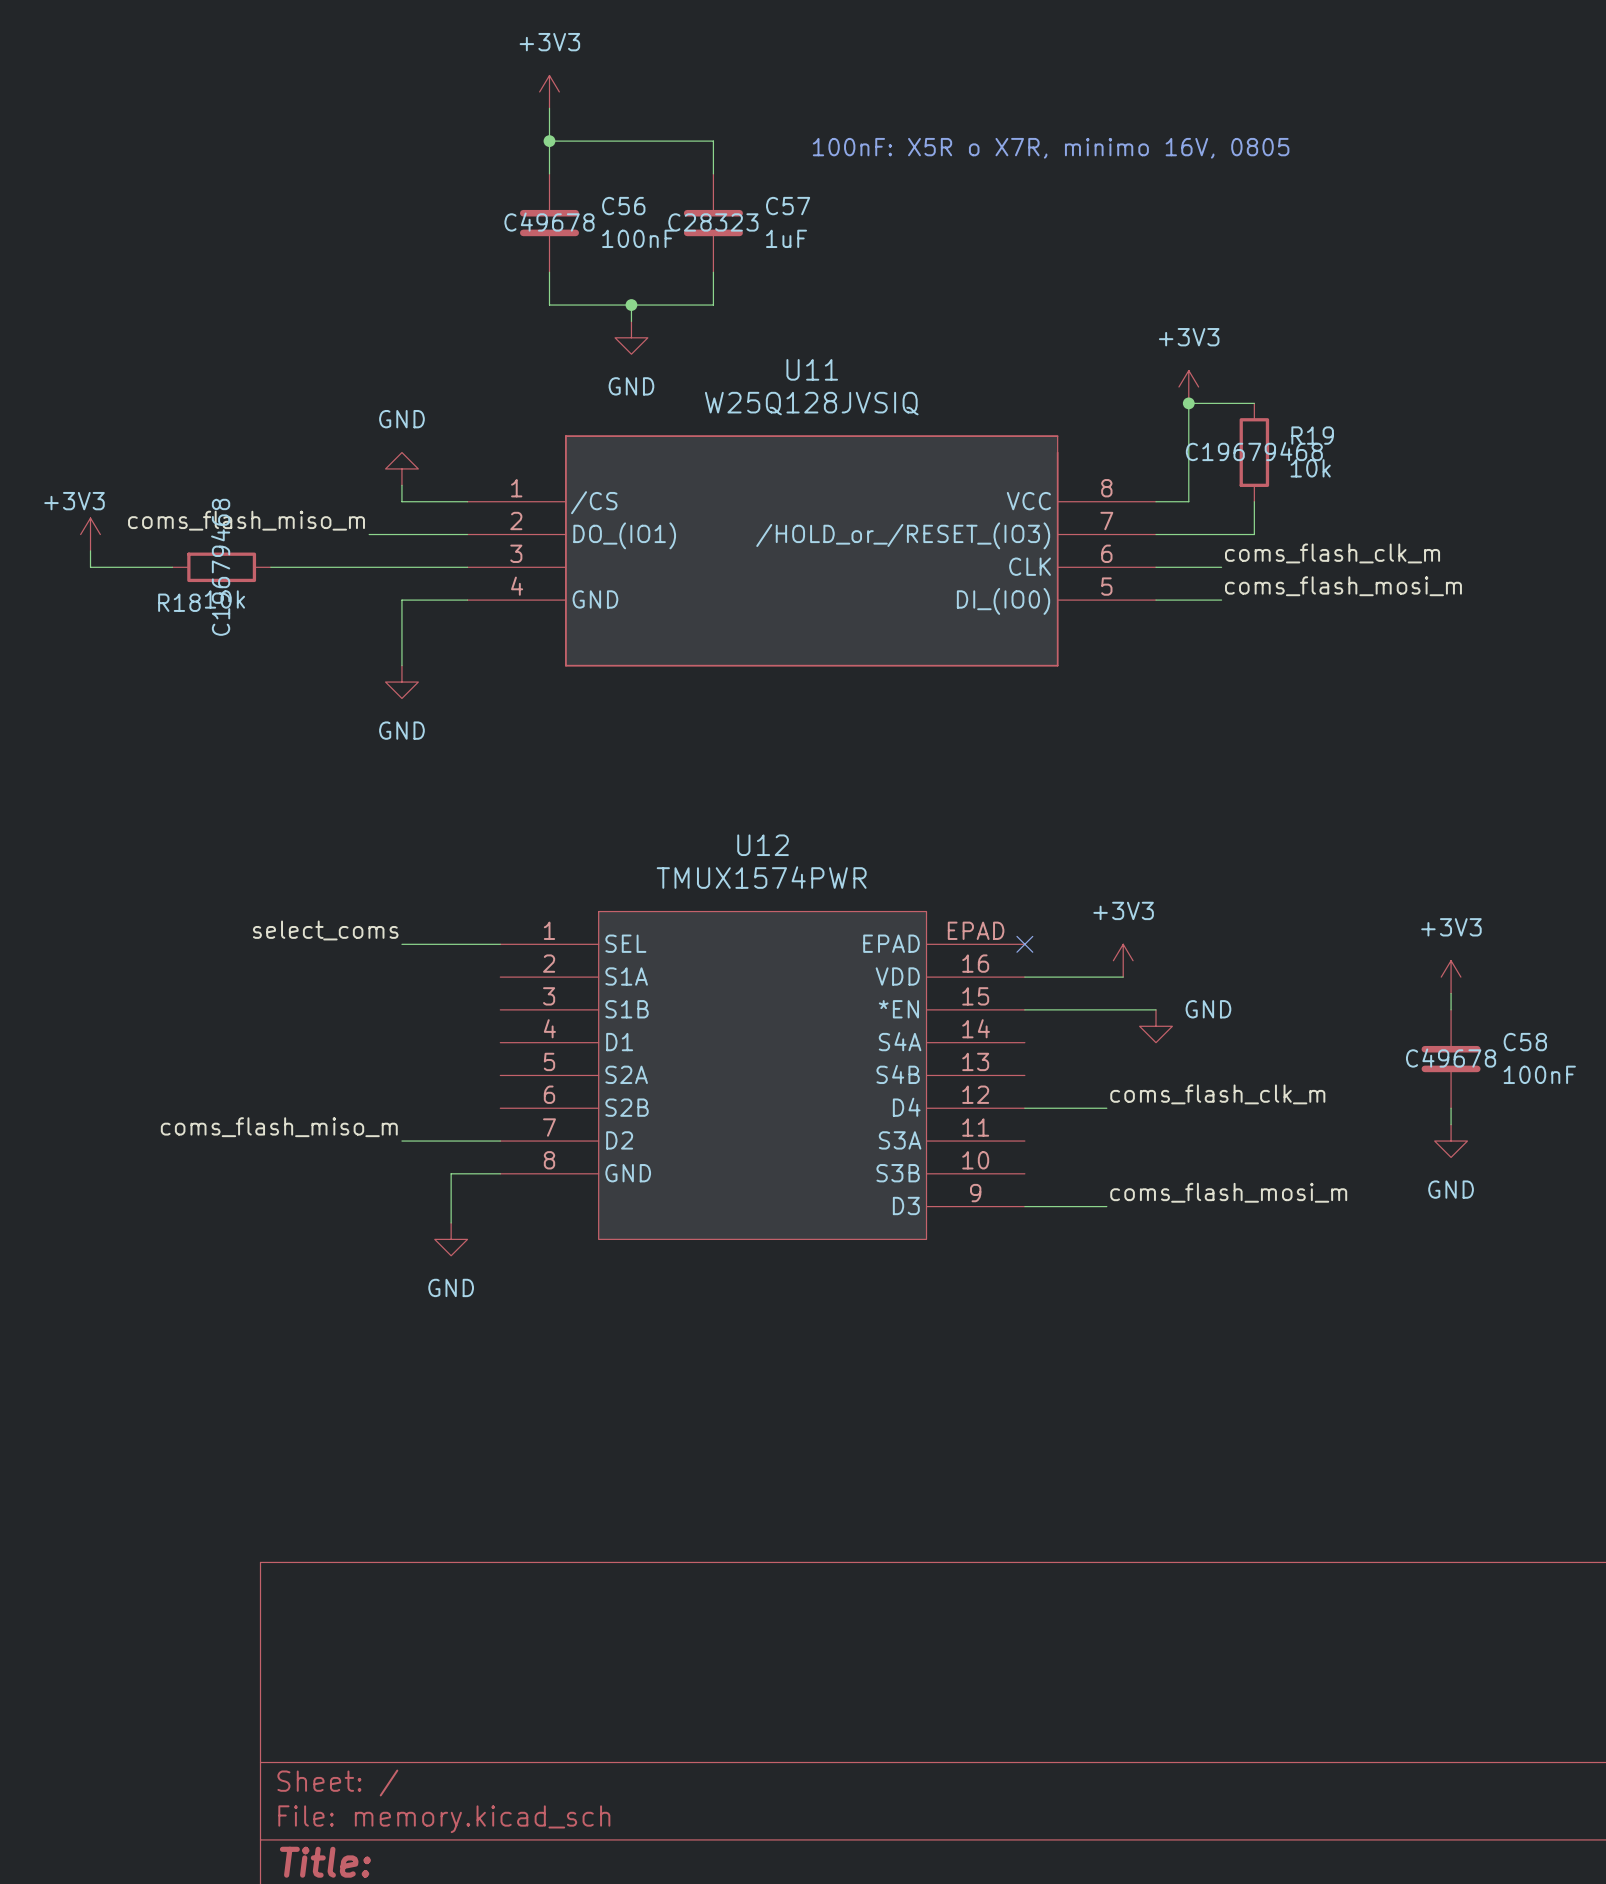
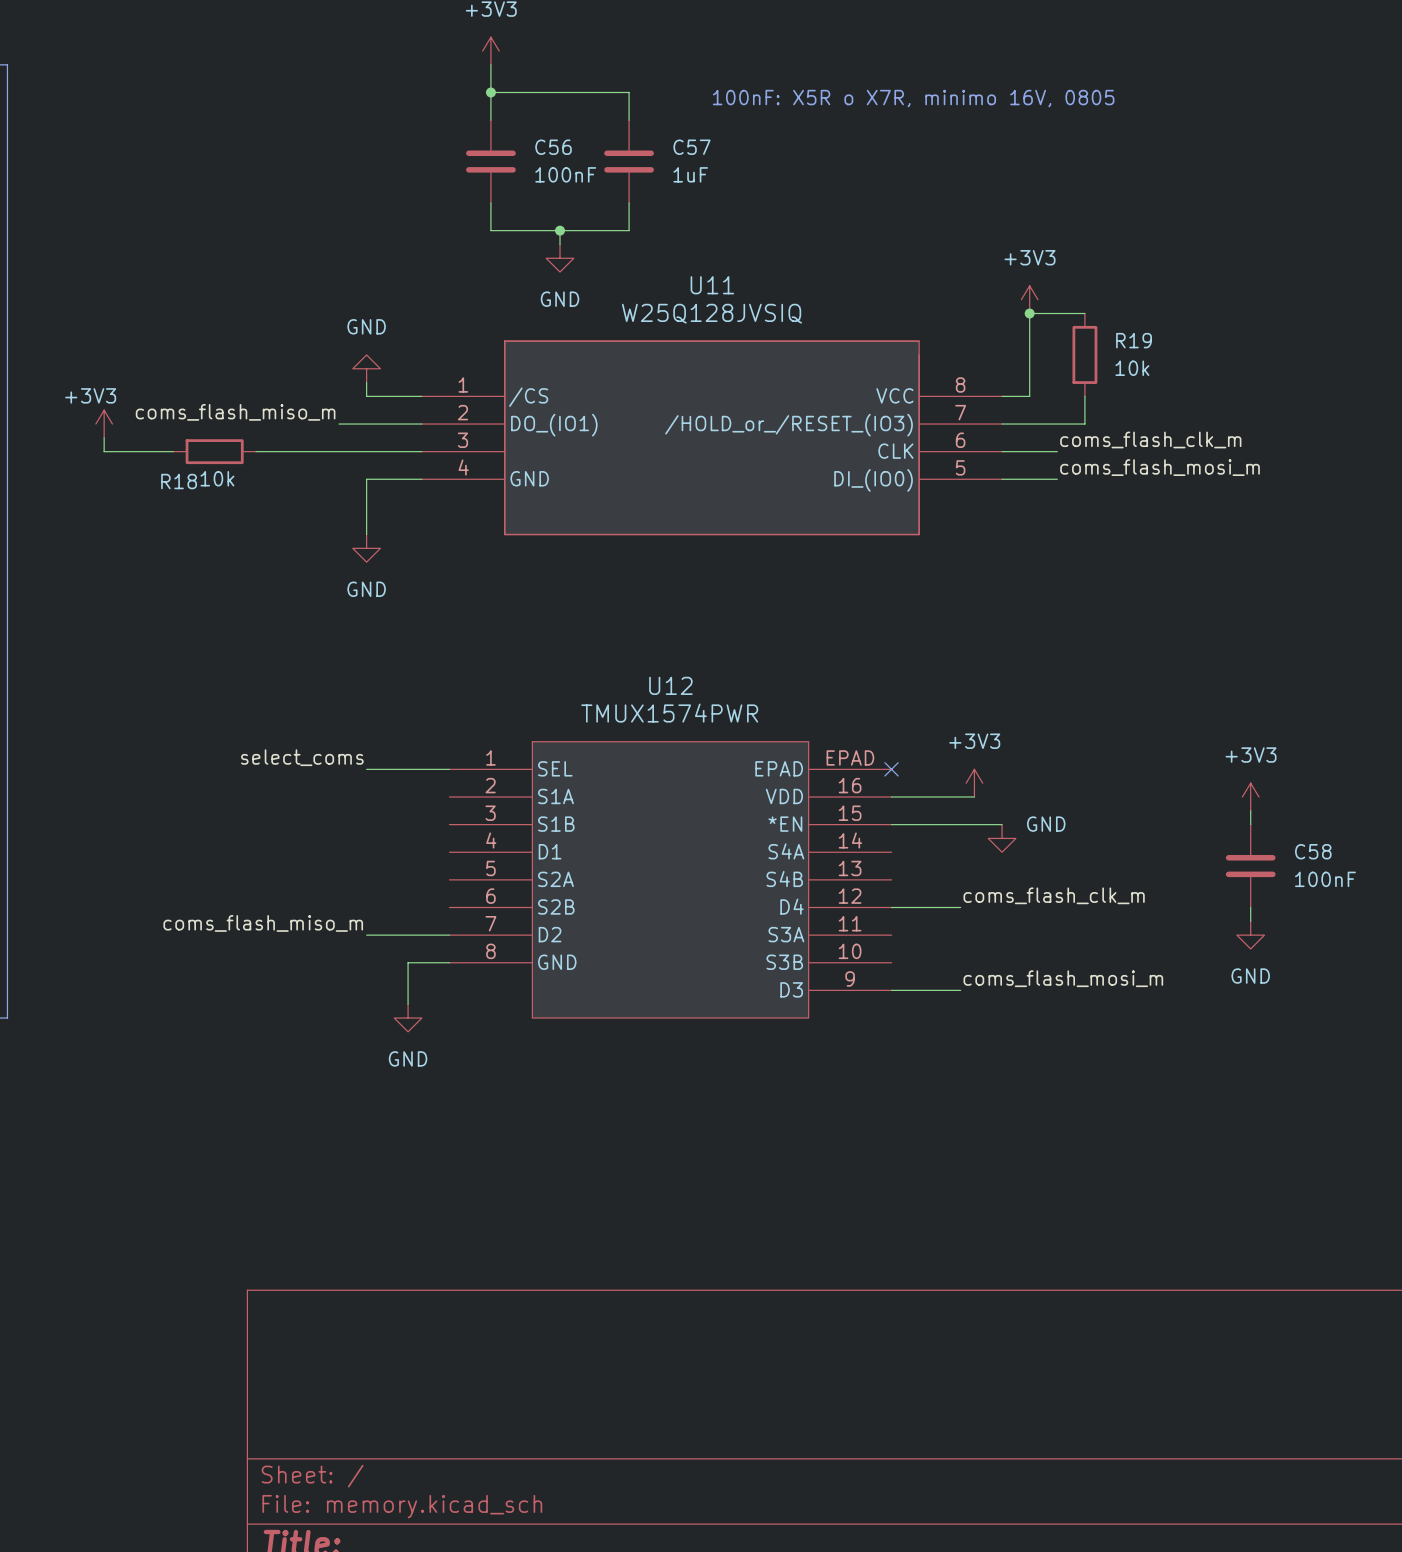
C56 text: C49678 (549, 222) -> none
C57 text: C28323 (713, 222) -> none
R19 text: C19679468 (1254, 451) -> none
R18 text: C19679468 (220, 567) -> none
C58 text: C49678 (1451, 1058) -> none

